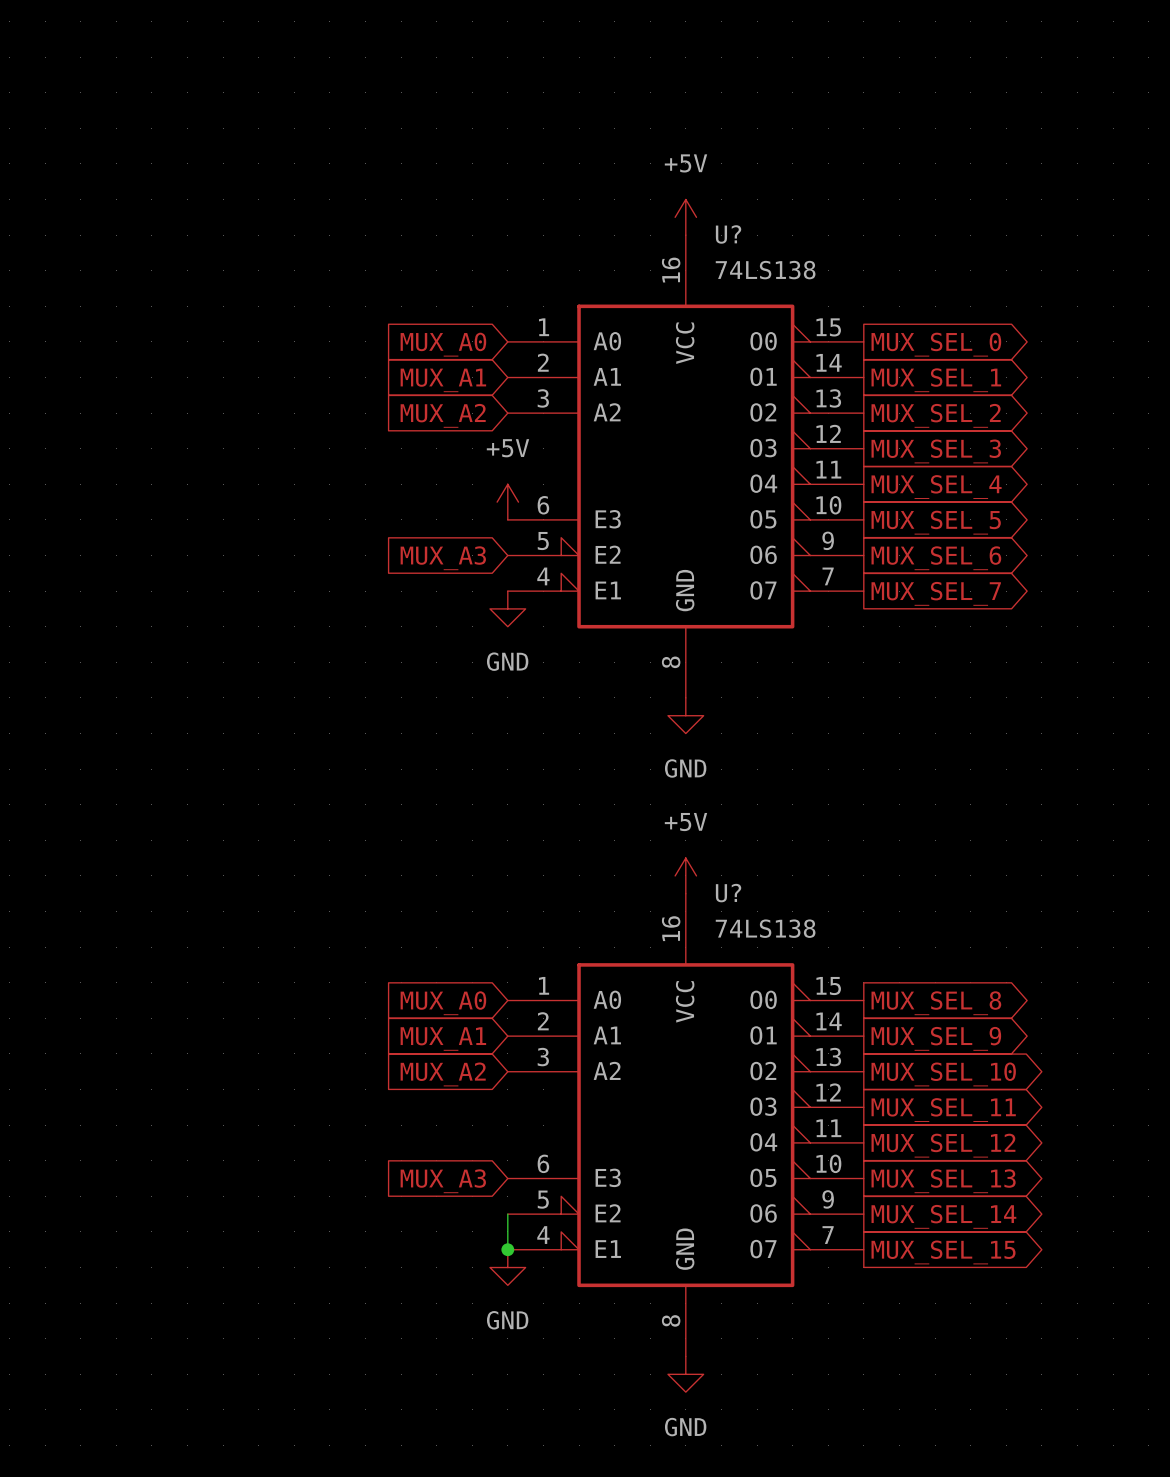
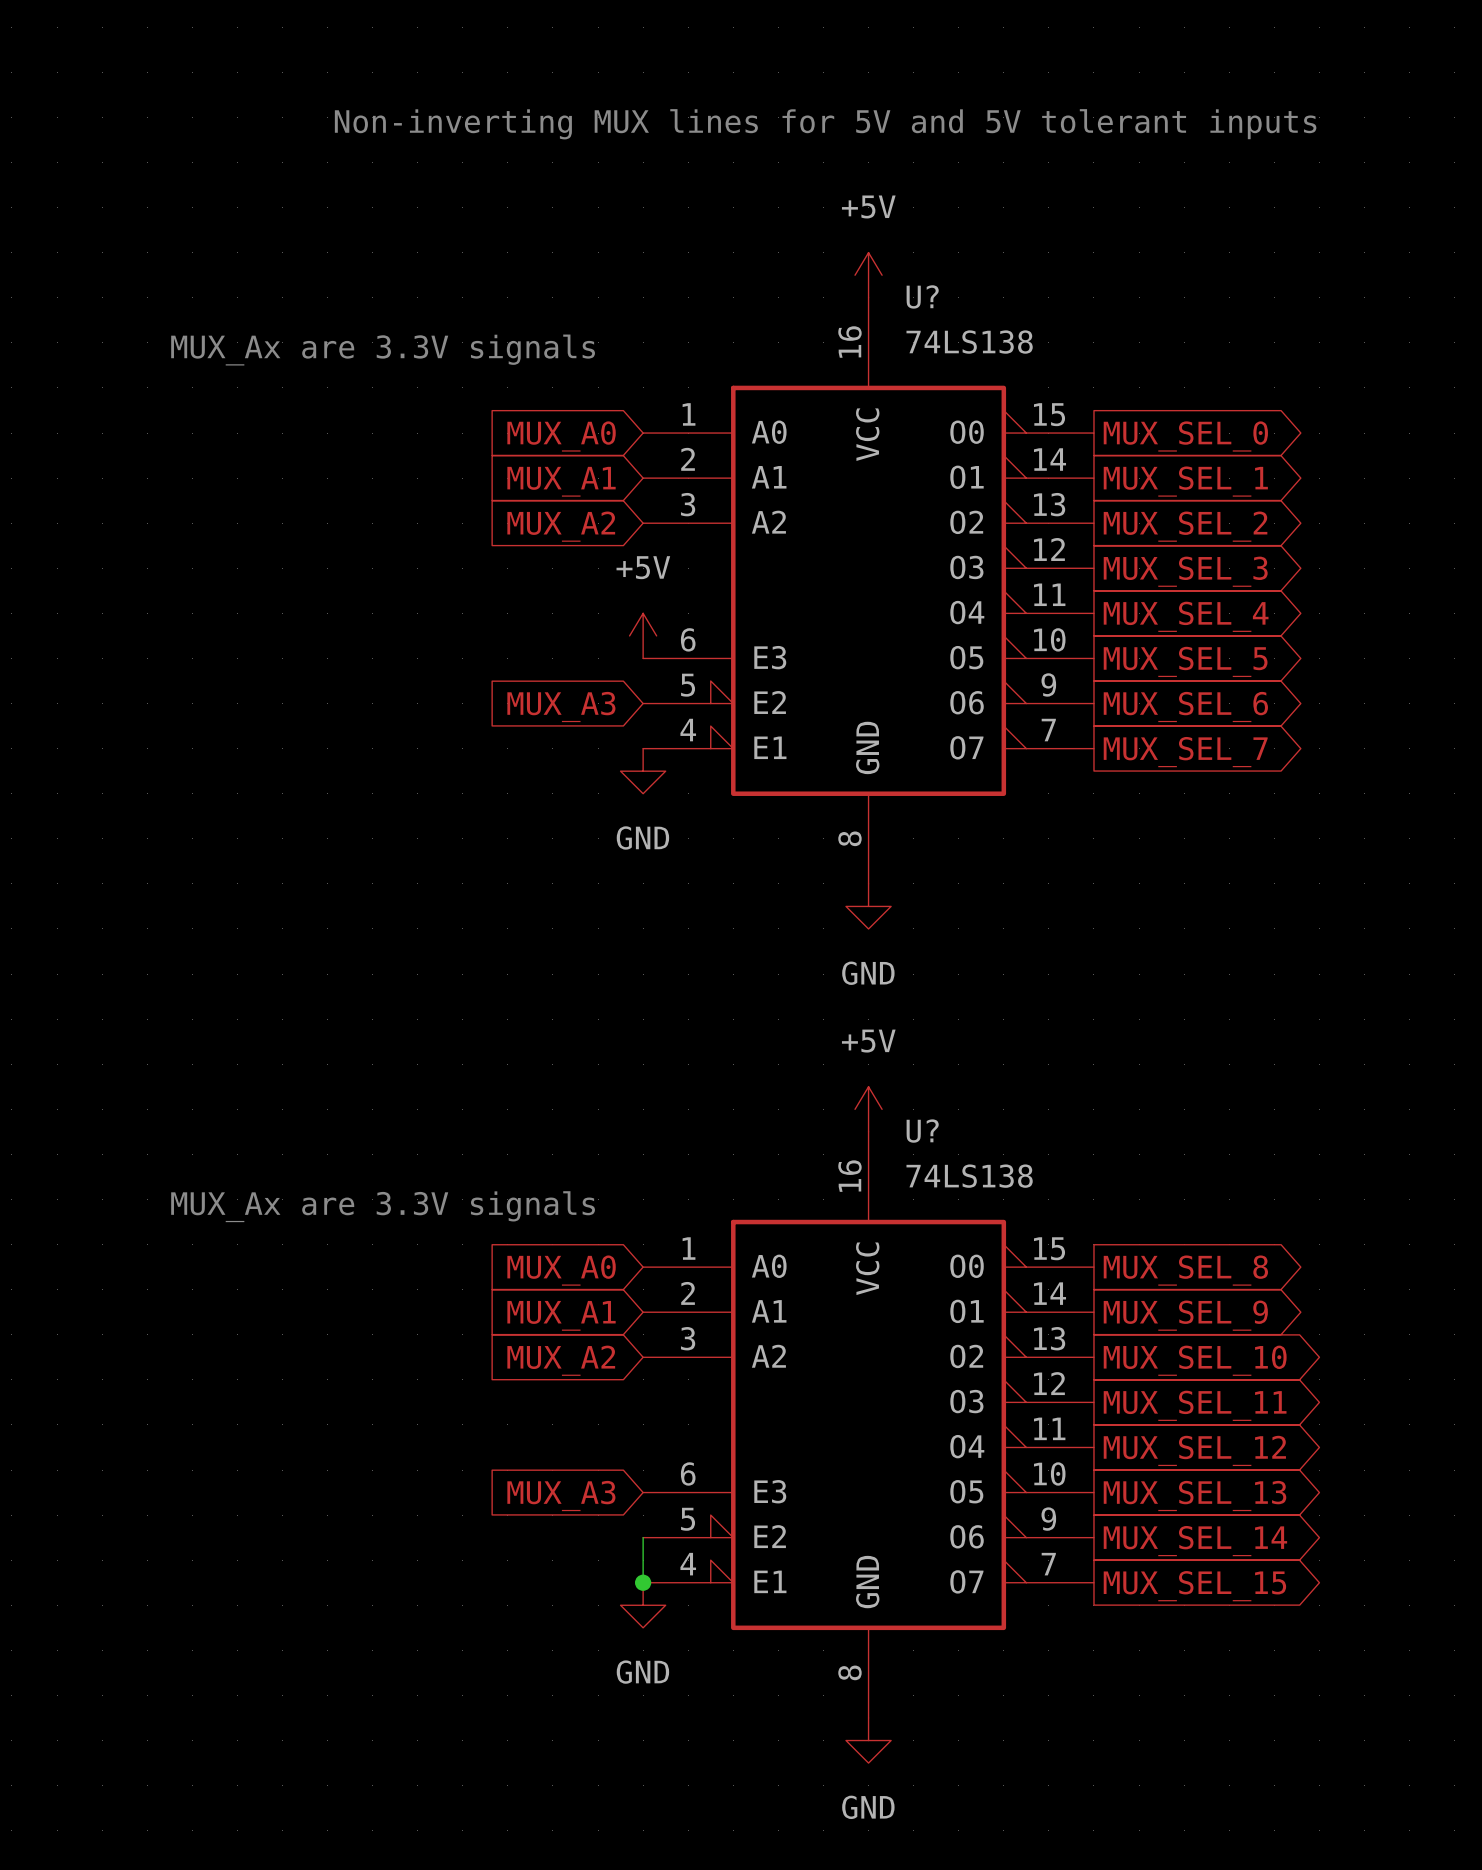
text: none -> Non-inverting MUX lines for 5V and 5V tolerant inputs (825, 124)
text: none -> MUX_Ax are 3.3V signals (383, 350)
text: none -> MUX_Ax are 3.3V signals (383, 1206)

